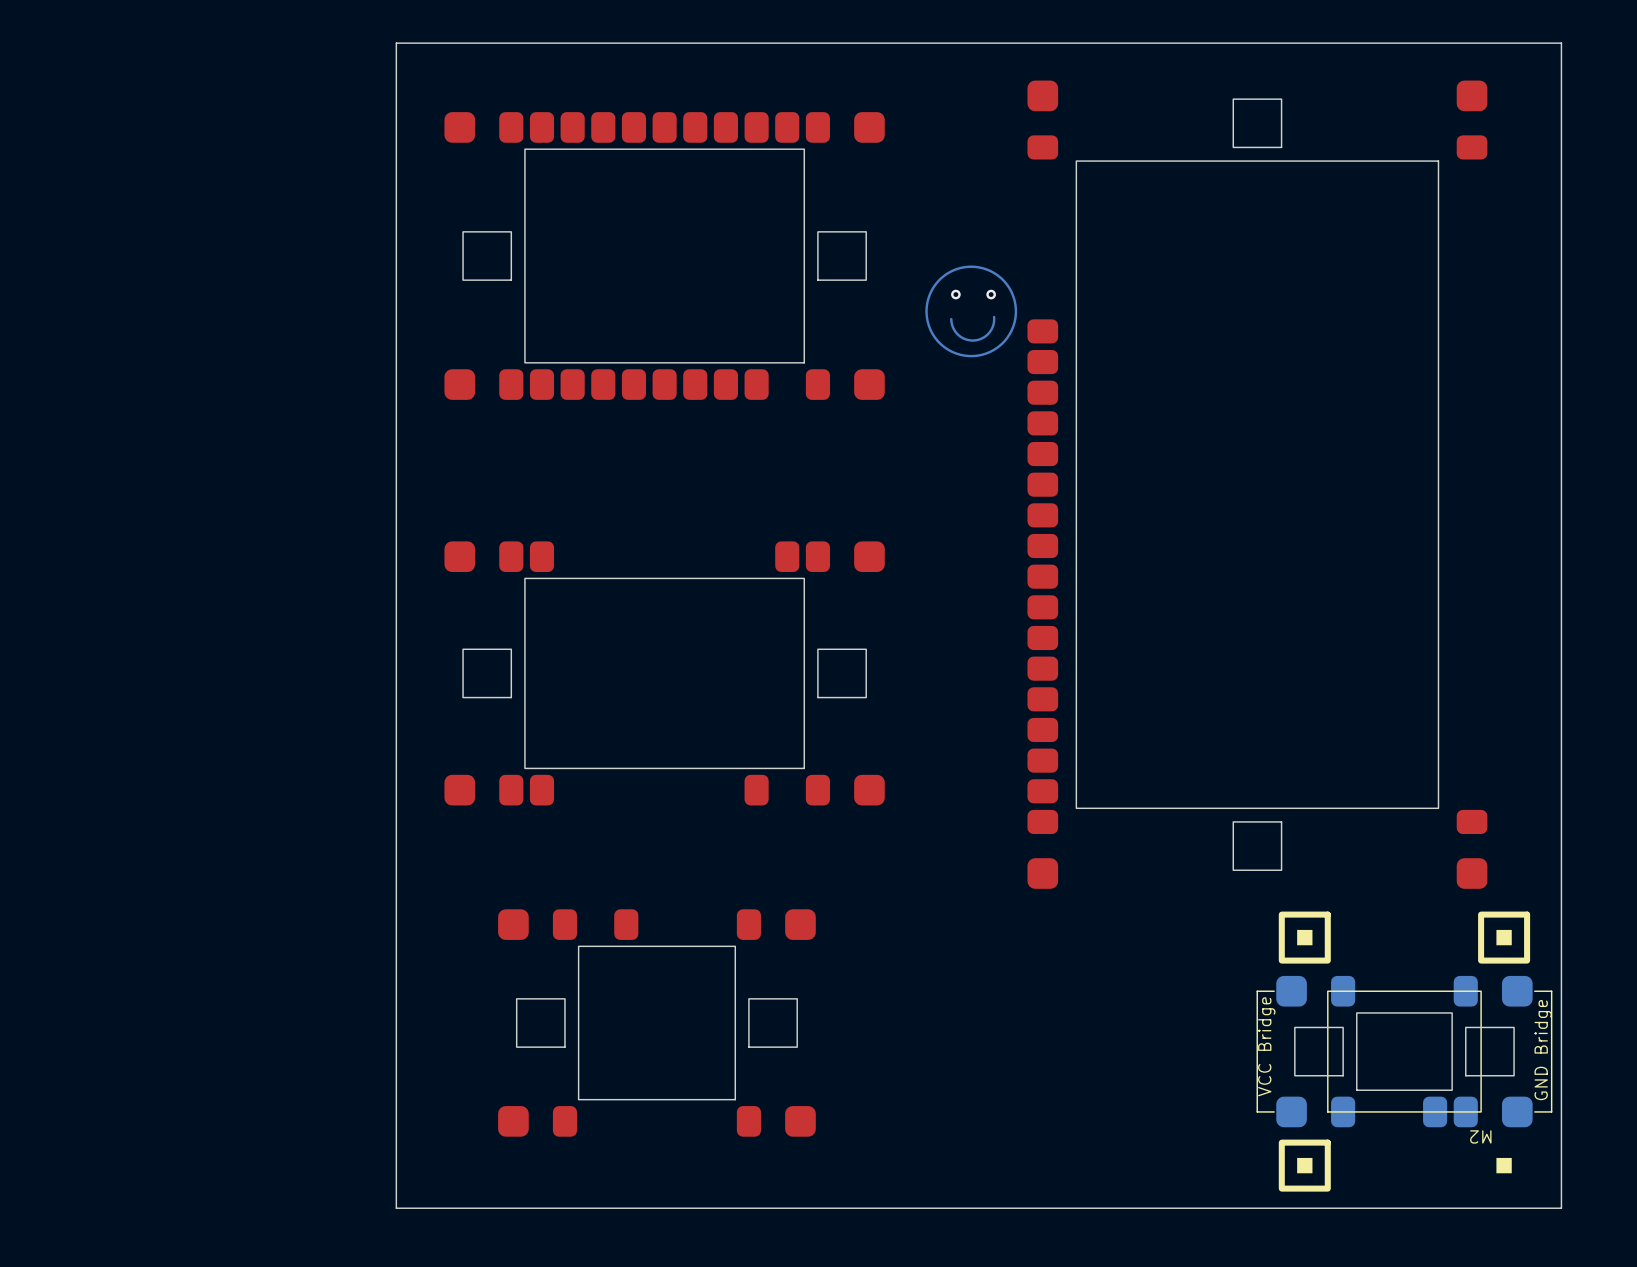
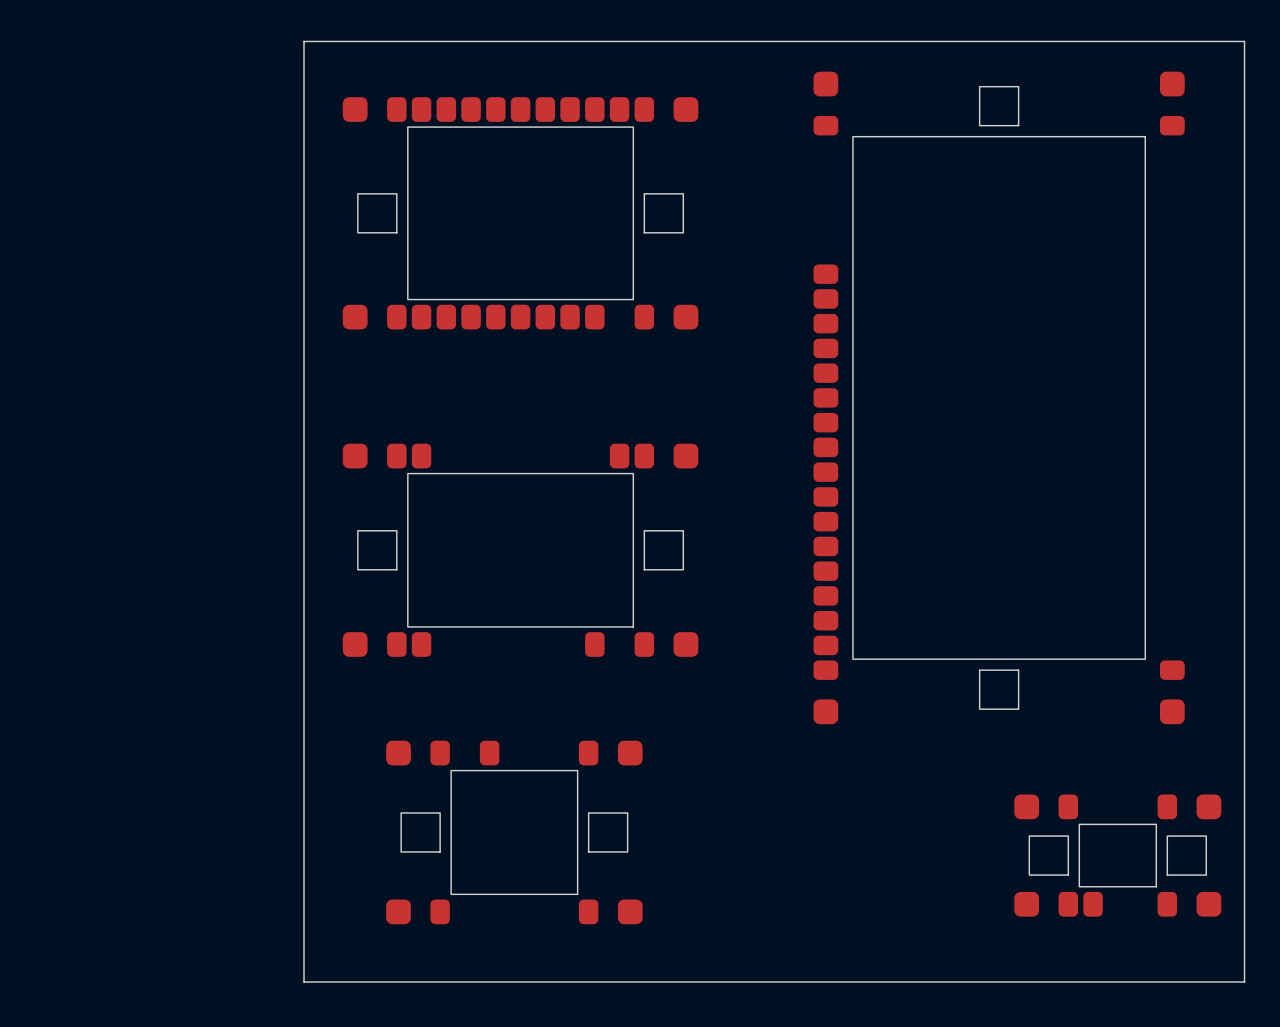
drawing: [925, 265, 1018, 358] -> none
via: (955, 294) -> none
via: (991, 294) -> none
bottom track: (994, 316) (992, 327) (988, 334) (973, 340) (965, 339) (957, 333) (951, 319) -> none
M2 side: bottom (1404, 1051) -> top (1117, 855)

